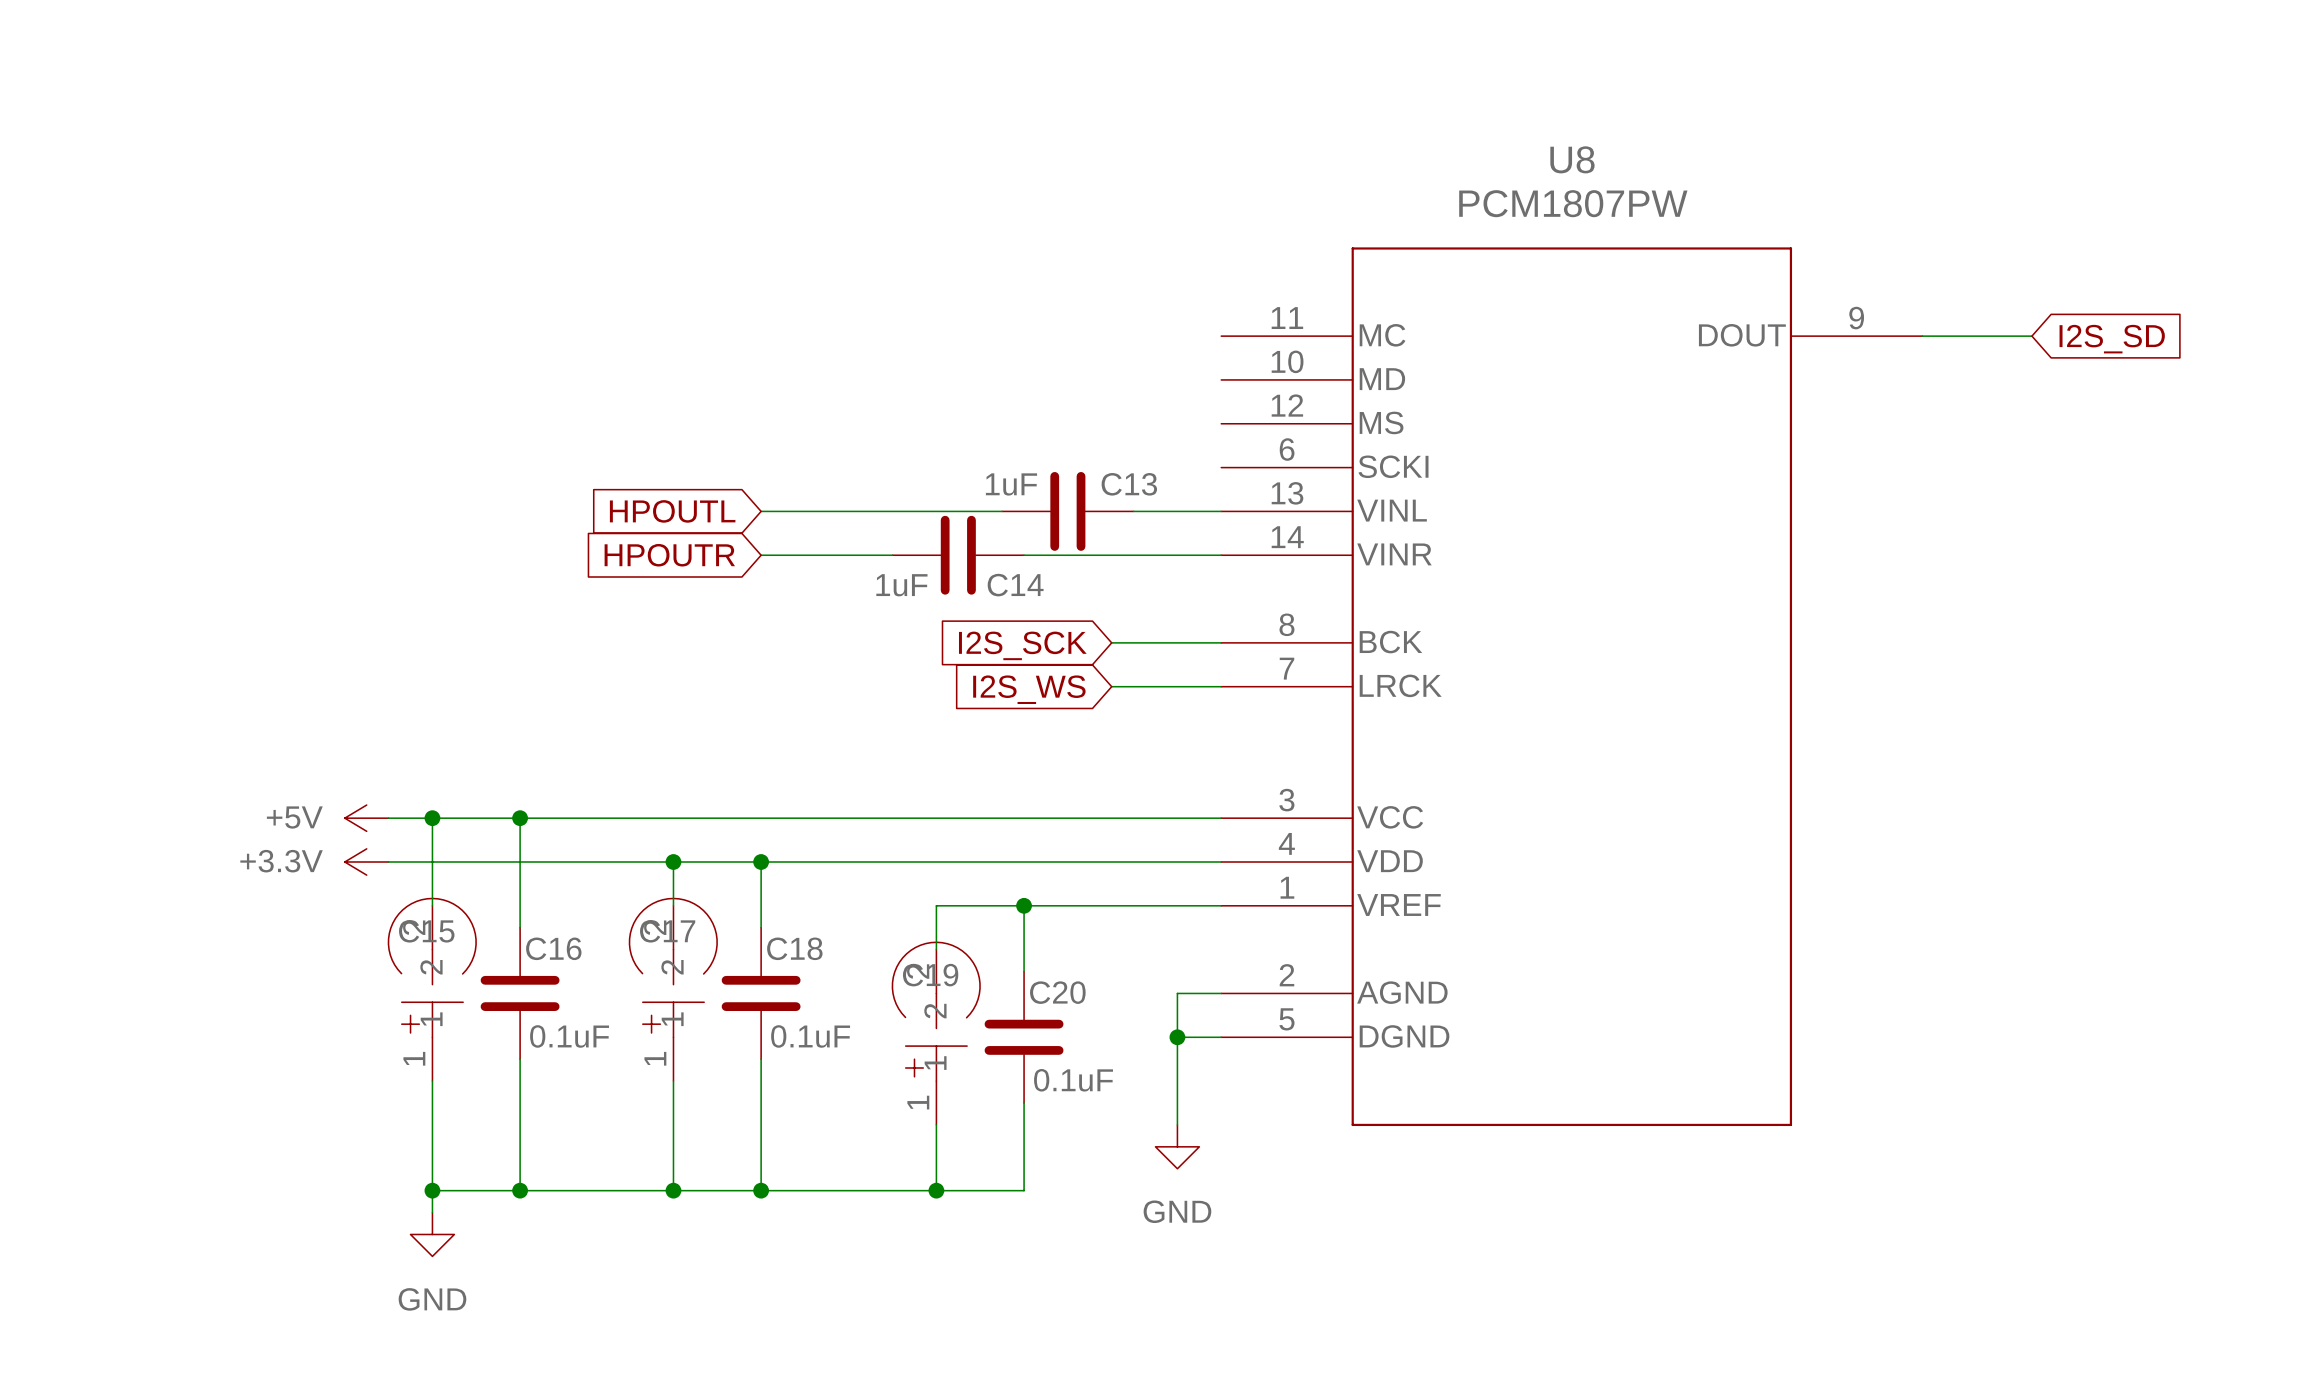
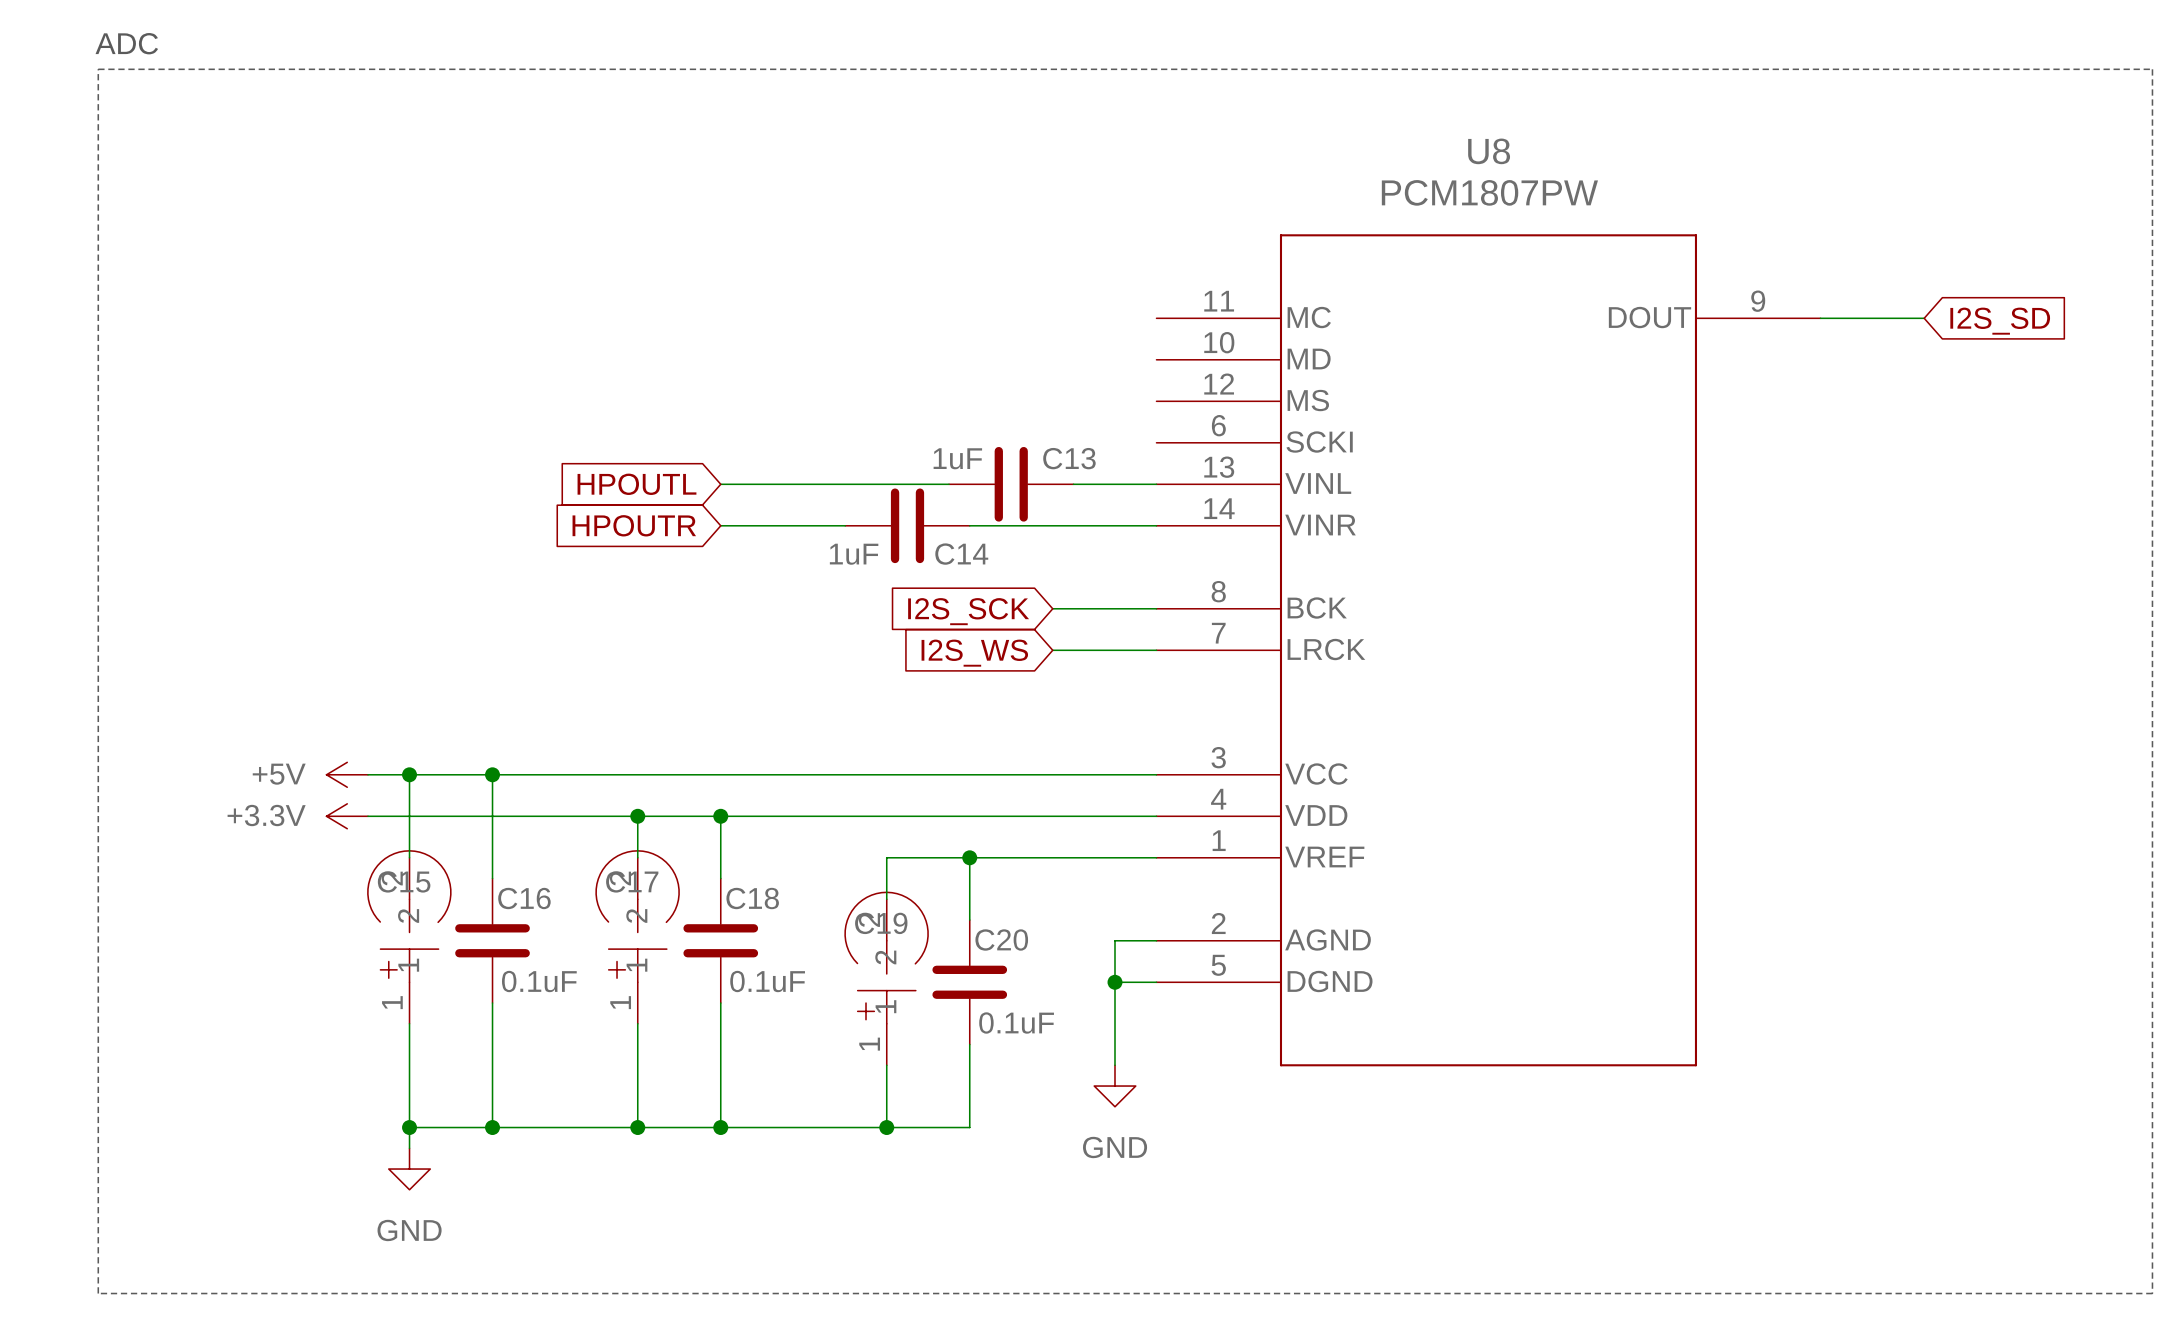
text: none -> ADC (126, 43)
line: none -> (98, 69) (2152, 69) (2152, 1293) (98, 1293) (98, 69)

